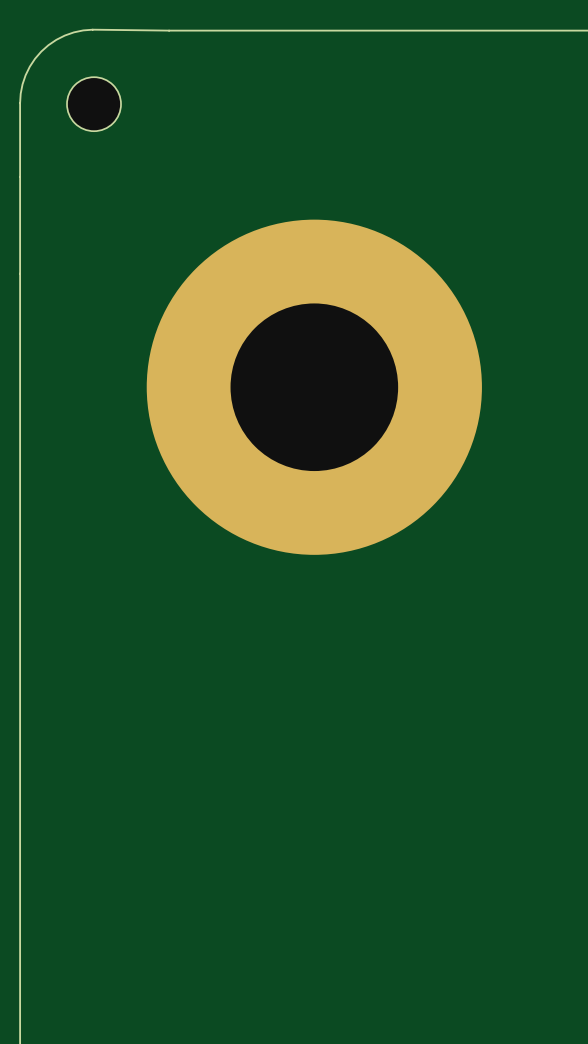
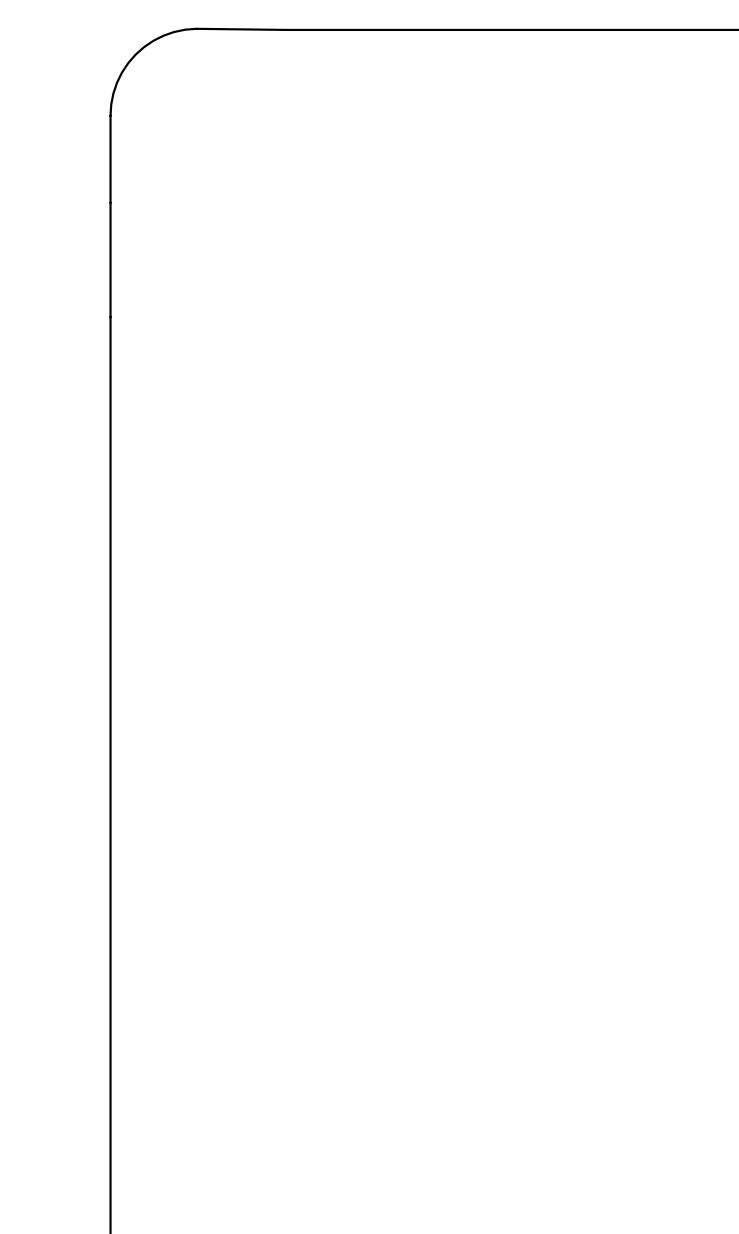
part: (94, 104) -> none
part: (314, 387) -> none

